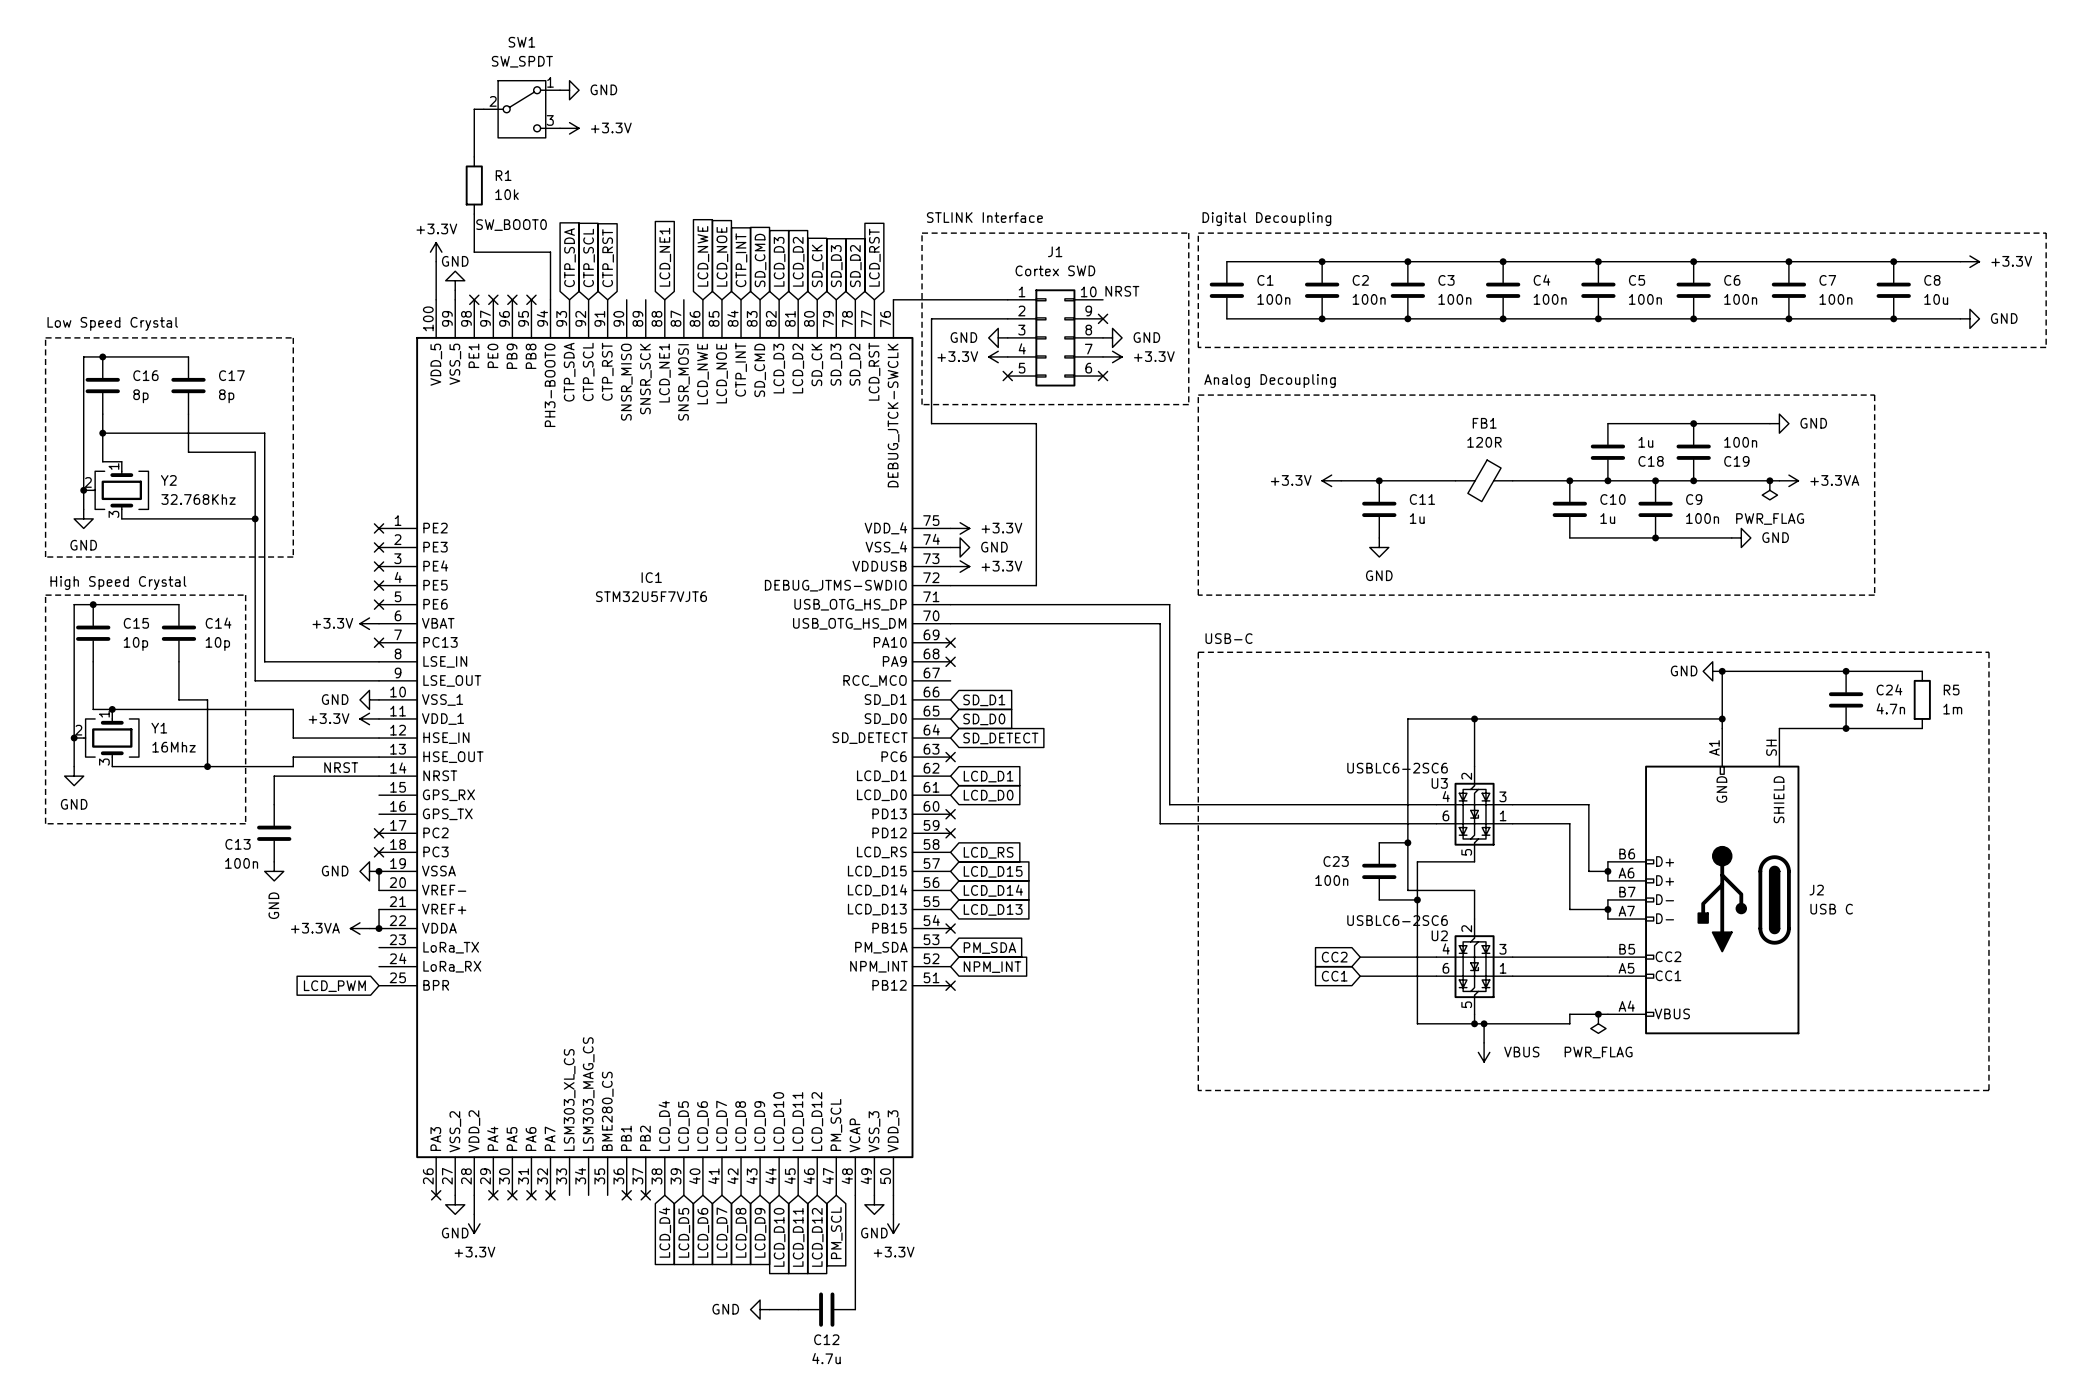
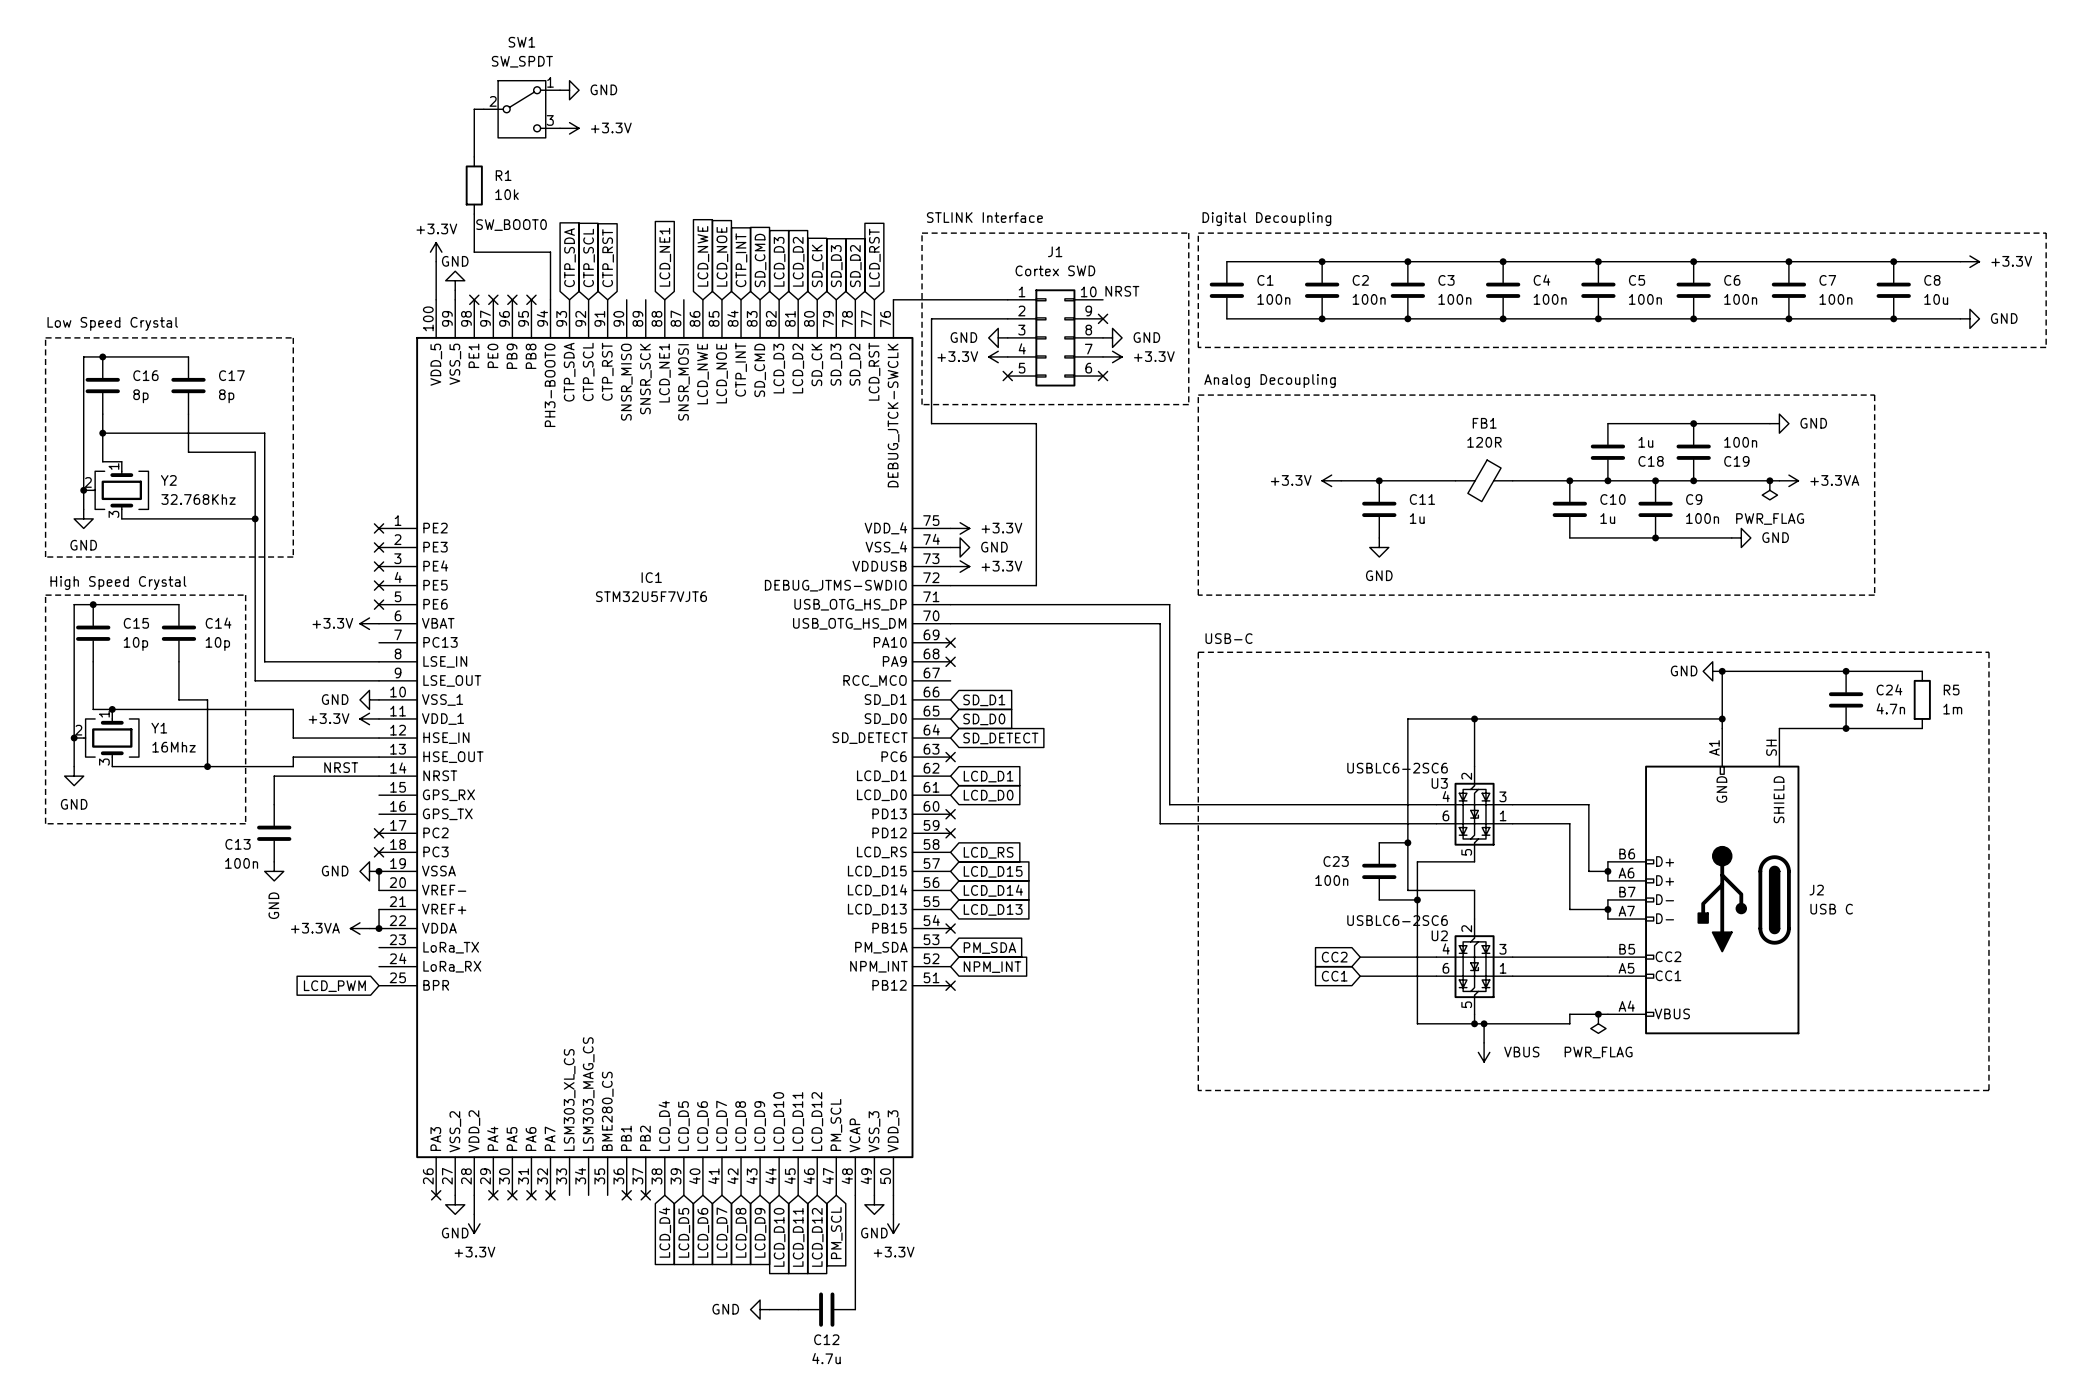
no-connect mark: (379, 642) -> none

